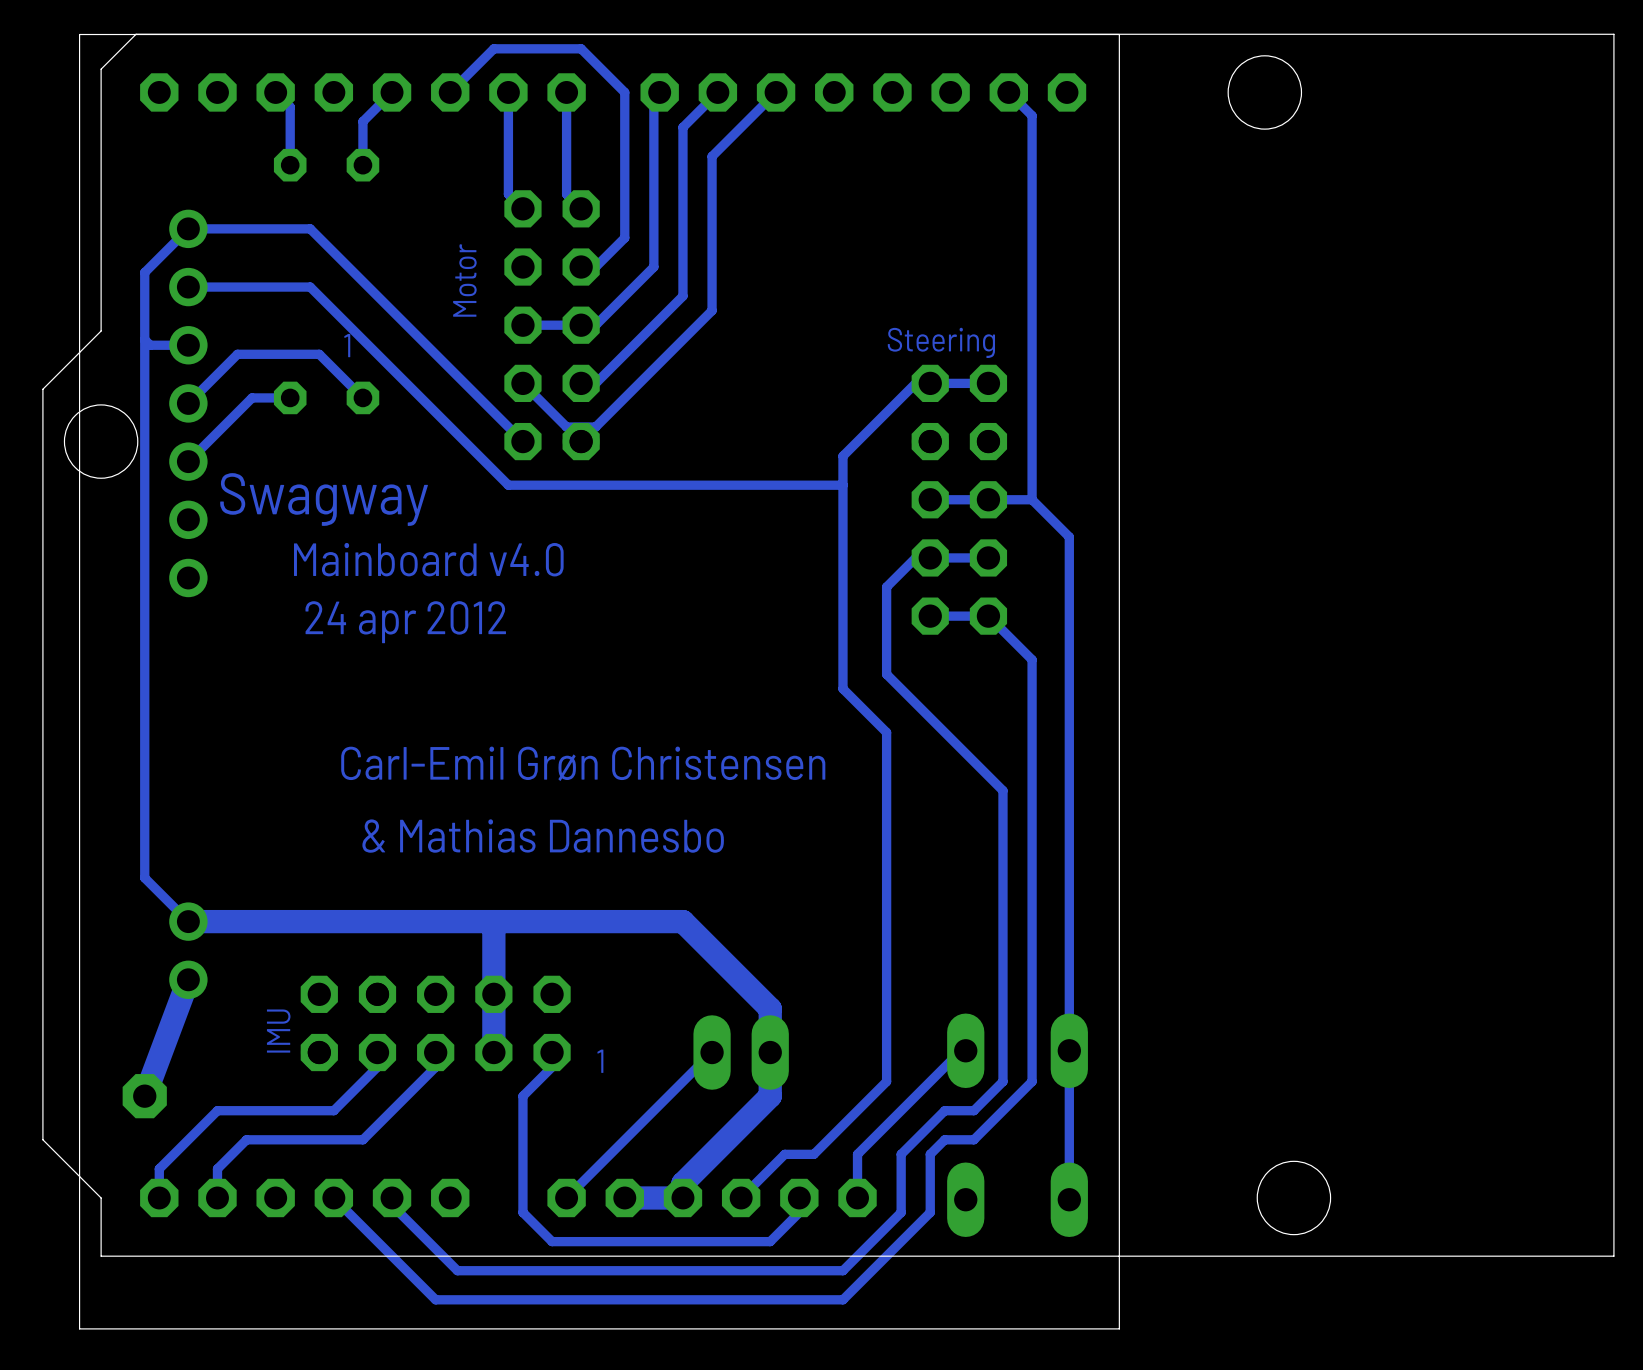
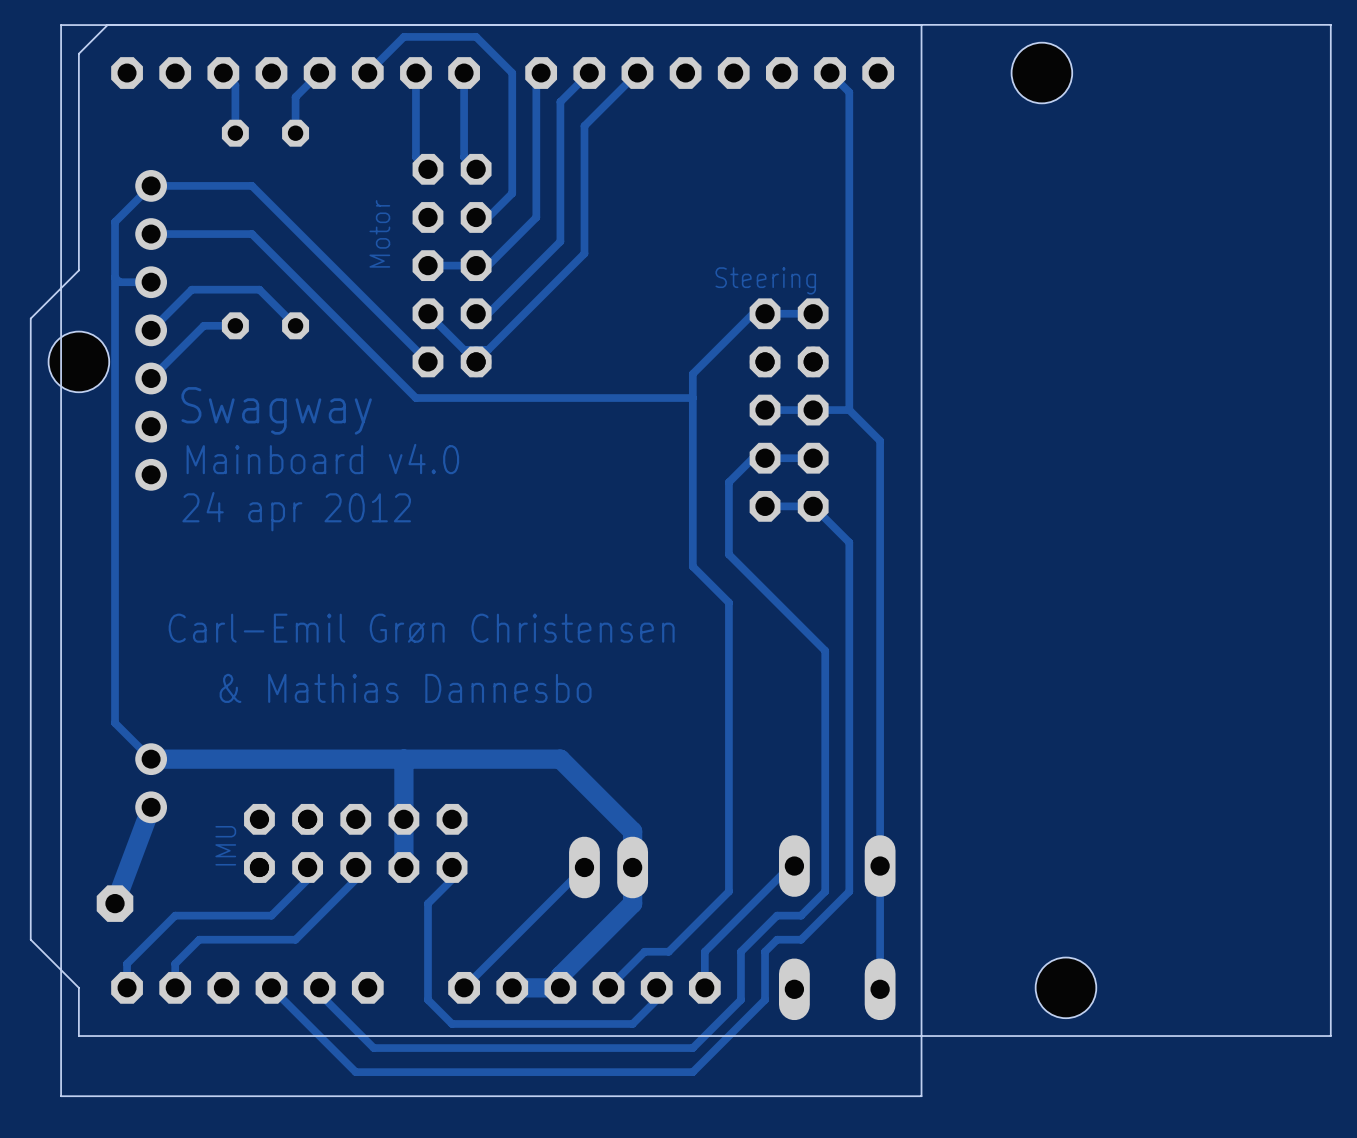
text: 1 (347, 345) -> none
text: 1 (600, 1061) -> none

